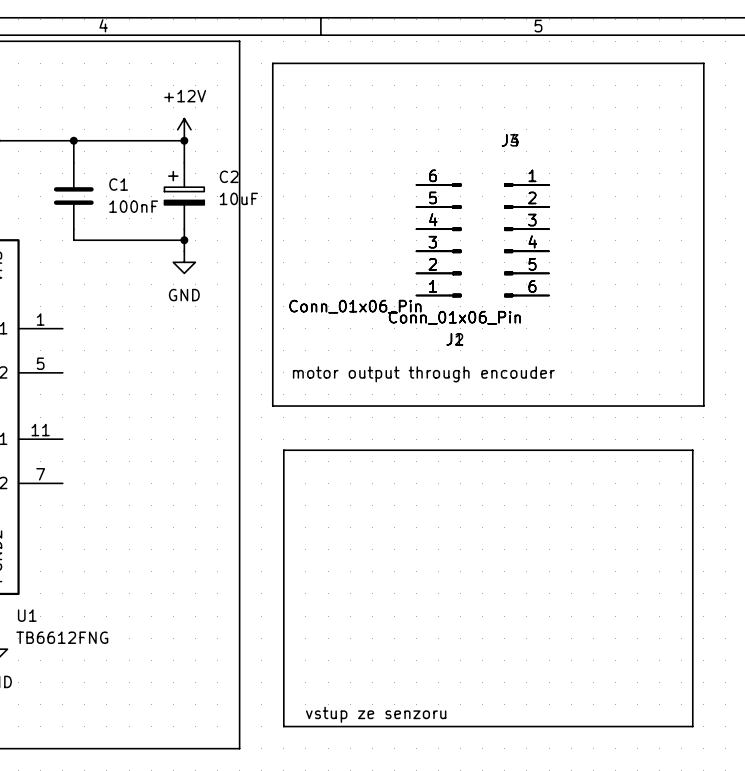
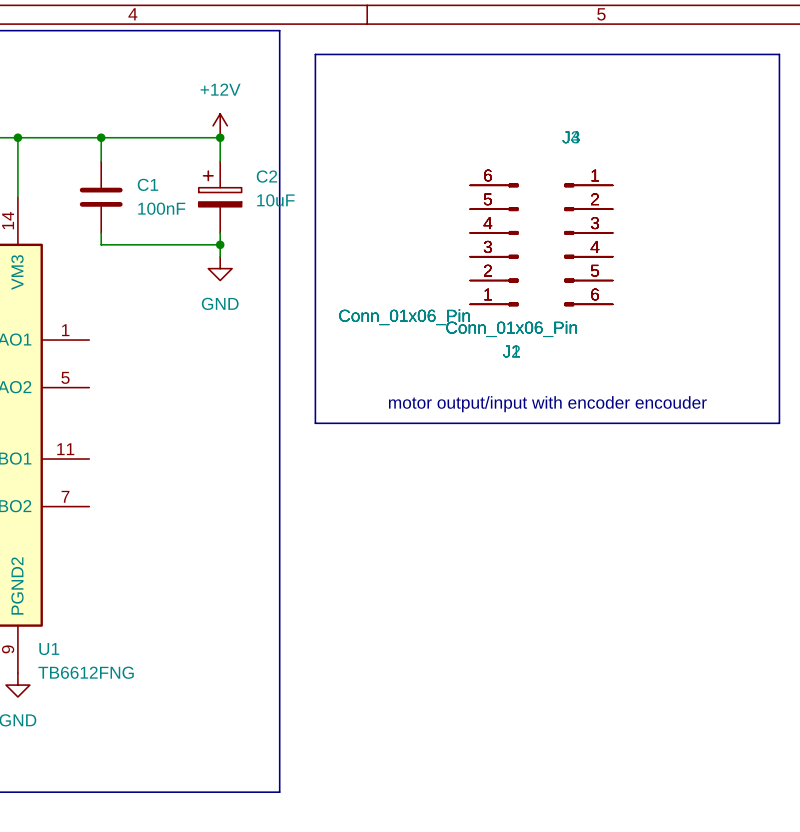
text: motor output through encouder (423, 374) -> motor output/input with encoder encouder (547, 404)
line: (283, 450) (692, 450) (692, 726) (283, 726) (283, 450) -> none
text: vstup ze senzoru (376, 714) -> none

